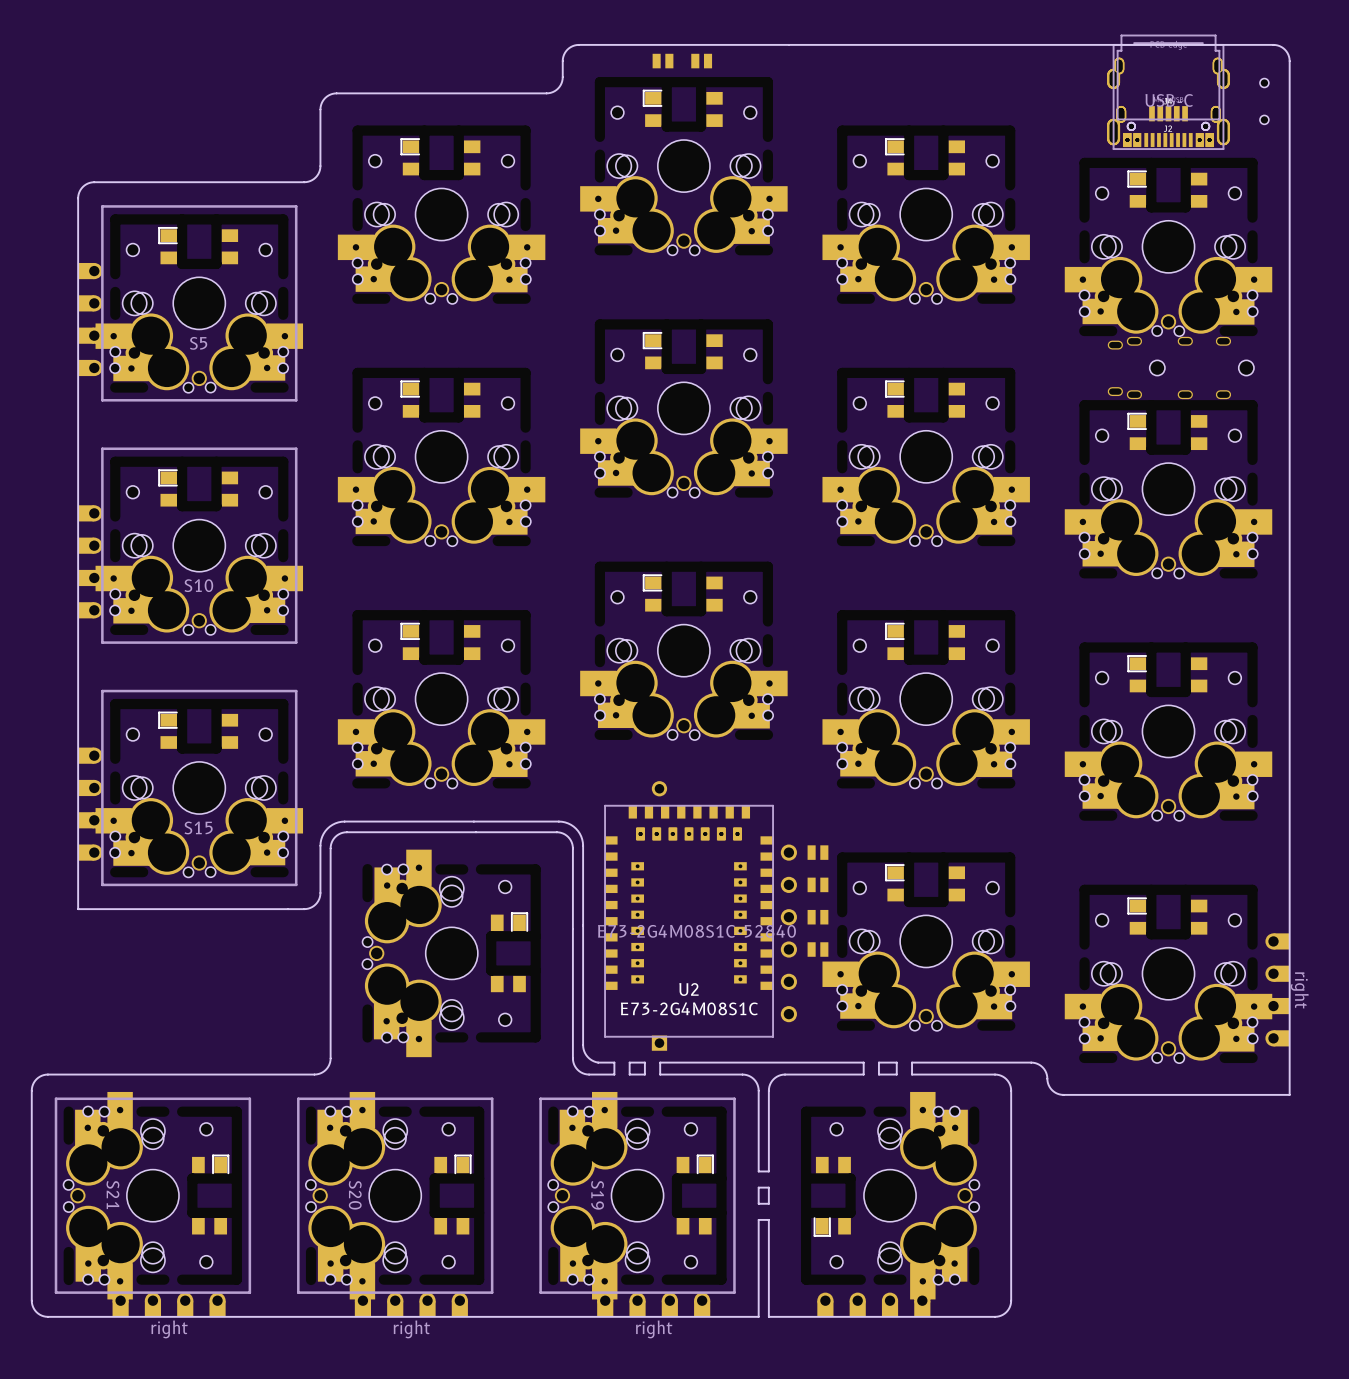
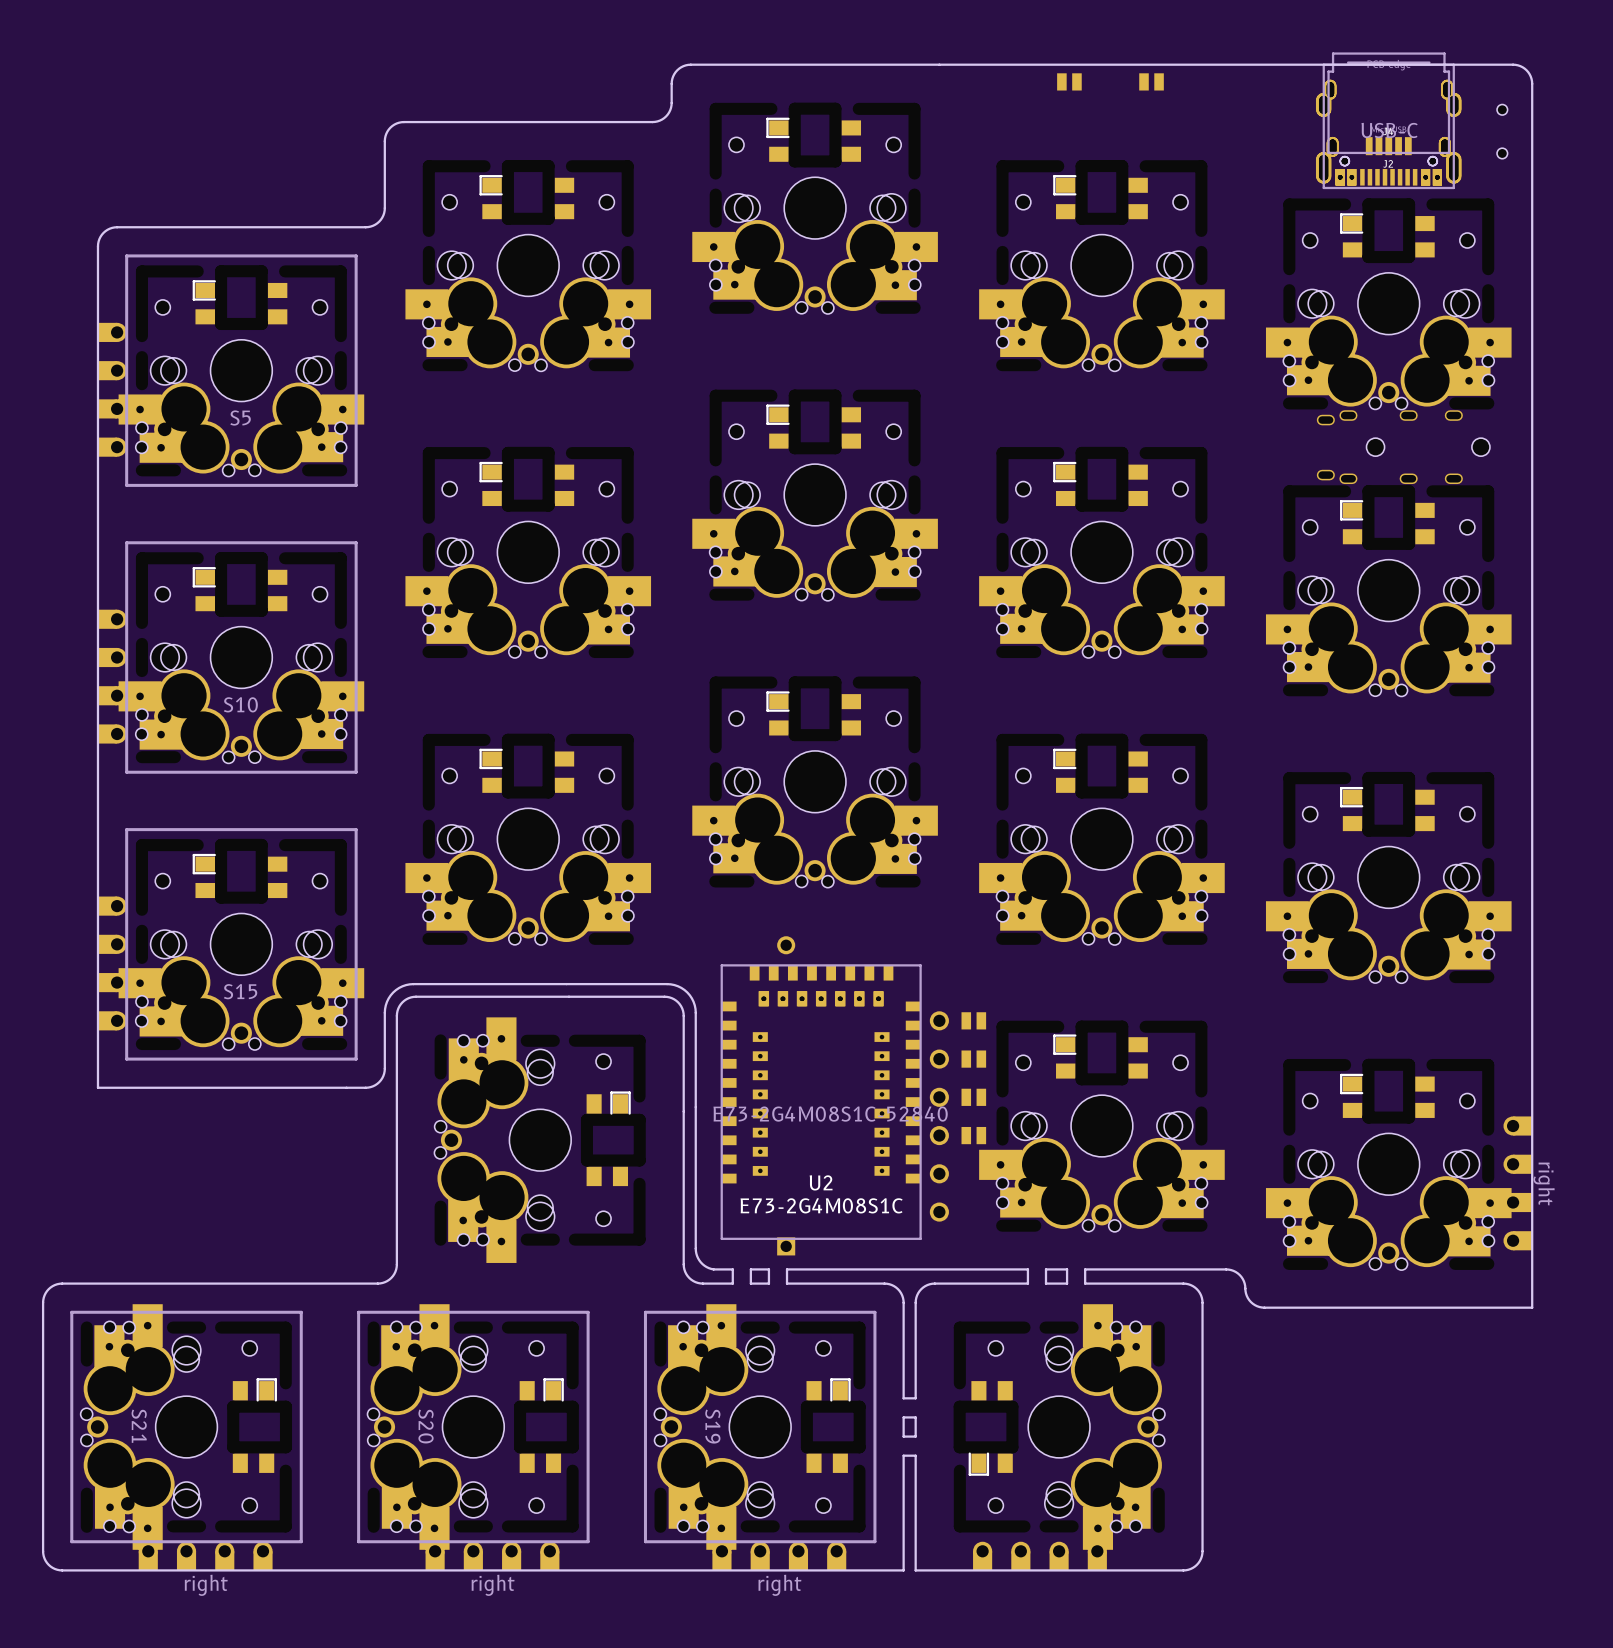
part: none -> (1069, 81)
part: none -> (1151, 81)
part: (663, 61) -> none
part: (701, 61) -> none
part footprint: [580, 77, 788, 256] -> [692, 102, 938, 314]
part footprint: [337, 125, 546, 304] -> [405, 160, 652, 372]
part footprint: [822, 125, 1030, 304] -> [979, 160, 1225, 372]
part footprint: [1064, 157, 1273, 337] -> [1265, 198, 1512, 410]
S5 footprint: [95, 205, 304, 402] -> [118, 254, 365, 487]
part footprint: [580, 319, 788, 498] -> [692, 389, 938, 601]
part footprint: [337, 367, 546, 547] -> [405, 446, 652, 659]
part footprint: [822, 367, 1030, 547] -> [979, 446, 1225, 659]
part footprint: [1064, 400, 1273, 579] -> [1265, 485, 1512, 697]
S10 footprint: [95, 447, 304, 644] -> [118, 541, 365, 774]
part footprint: [580, 561, 788, 741] -> [692, 676, 938, 888]
part footprint: [337, 610, 546, 789] -> [405, 733, 652, 946]
part footprint: [822, 610, 1030, 789] -> [979, 733, 1225, 946]
part footprint: [1064, 642, 1273, 821] -> [1265, 771, 1512, 984]
S15 footprint: [95, 689, 304, 887] -> [118, 828, 365, 1061]
part footprint: [362, 849, 541, 1058] -> [434, 1017, 646, 1263]
part footprint: [822, 852, 1030, 1031] -> [979, 1020, 1225, 1232]
part footprint: [1064, 884, 1273, 1064] -> [1265, 1058, 1512, 1271]
S21 footprint: [54, 1091, 252, 1300] -> [70, 1304, 303, 1550]
S20 footprint: [297, 1091, 494, 1300] -> [357, 1304, 590, 1550]
S19 footprint: [539, 1091, 736, 1300] -> [643, 1304, 877, 1550]
part footprint: [800, 1091, 980, 1300] -> [953, 1304, 1165, 1550]

